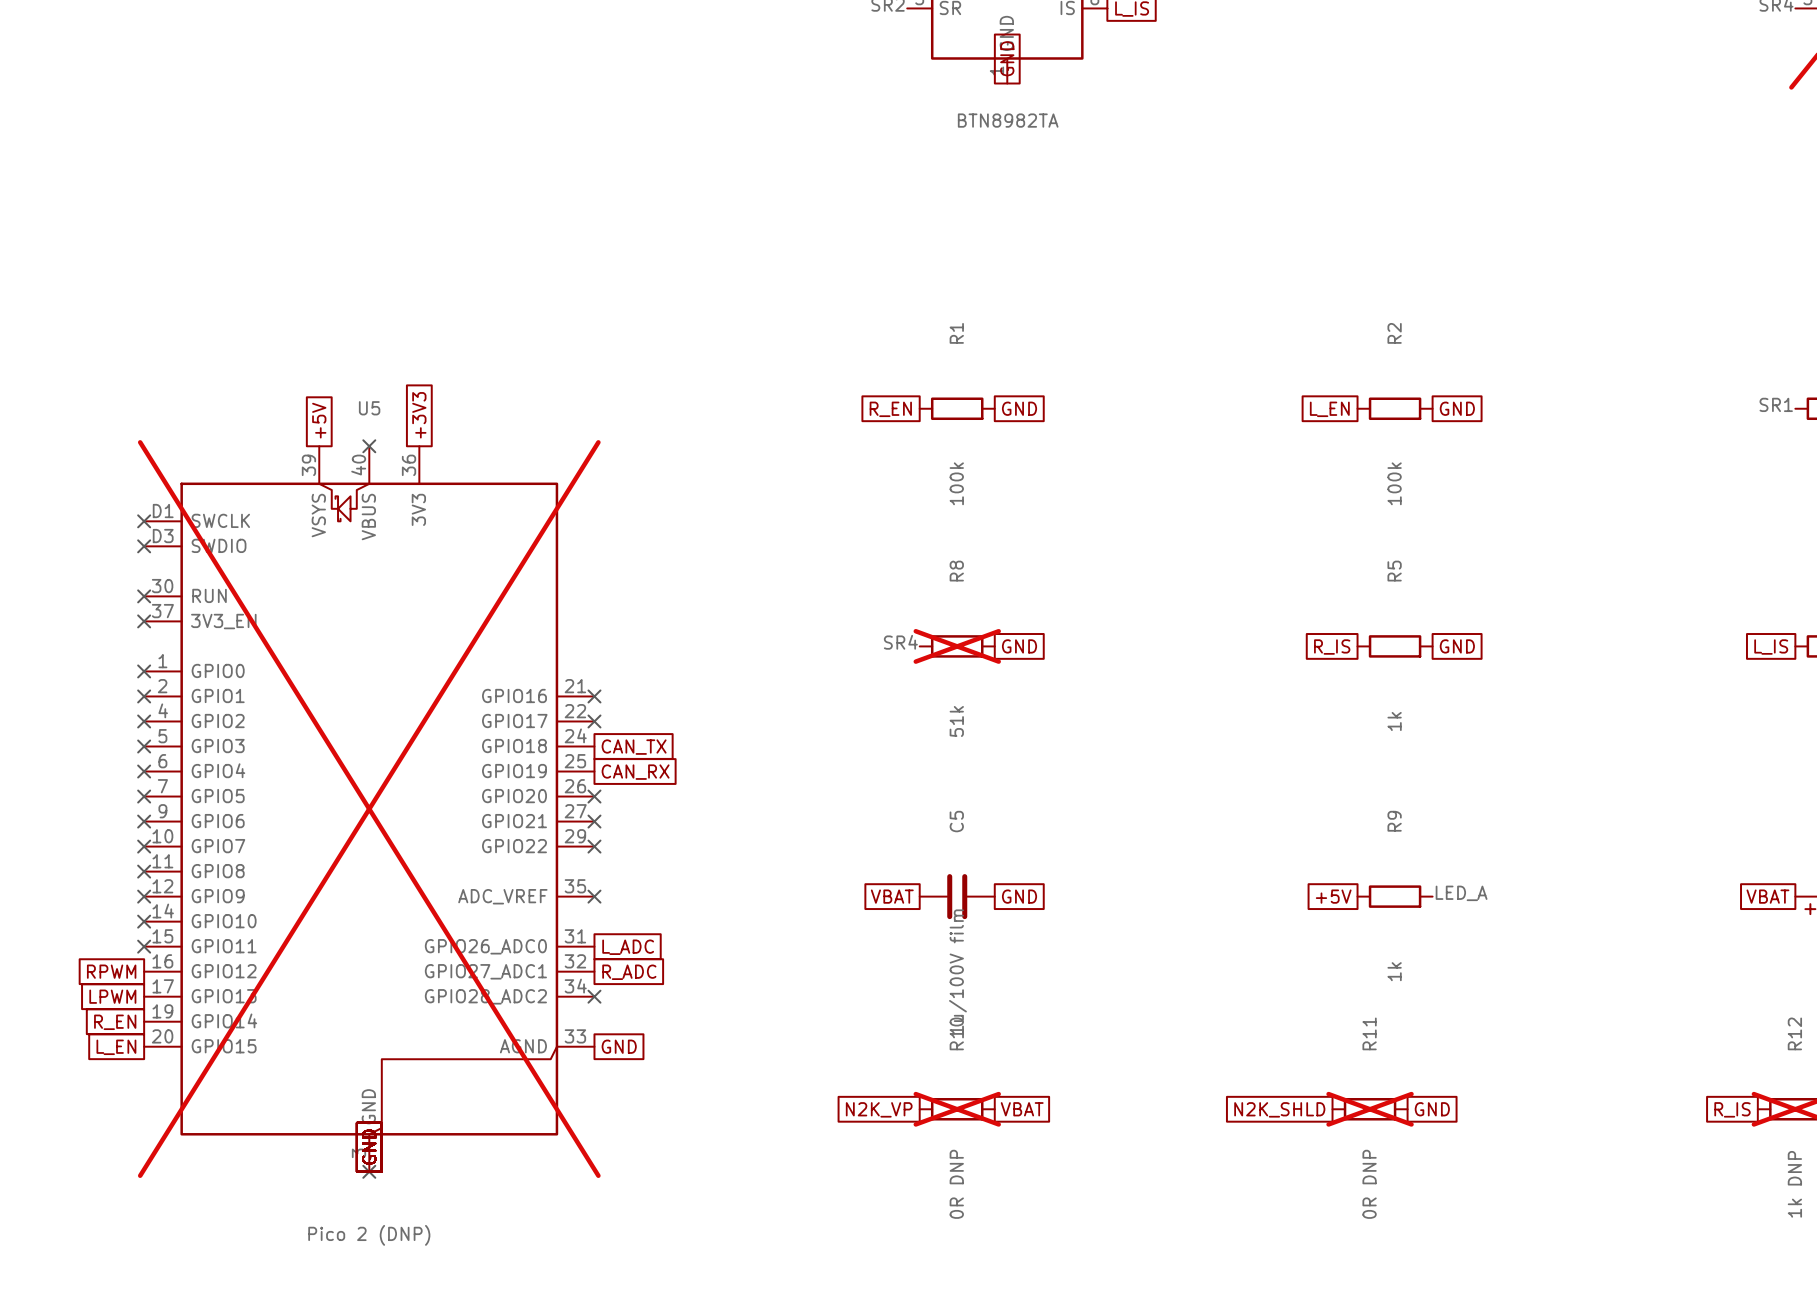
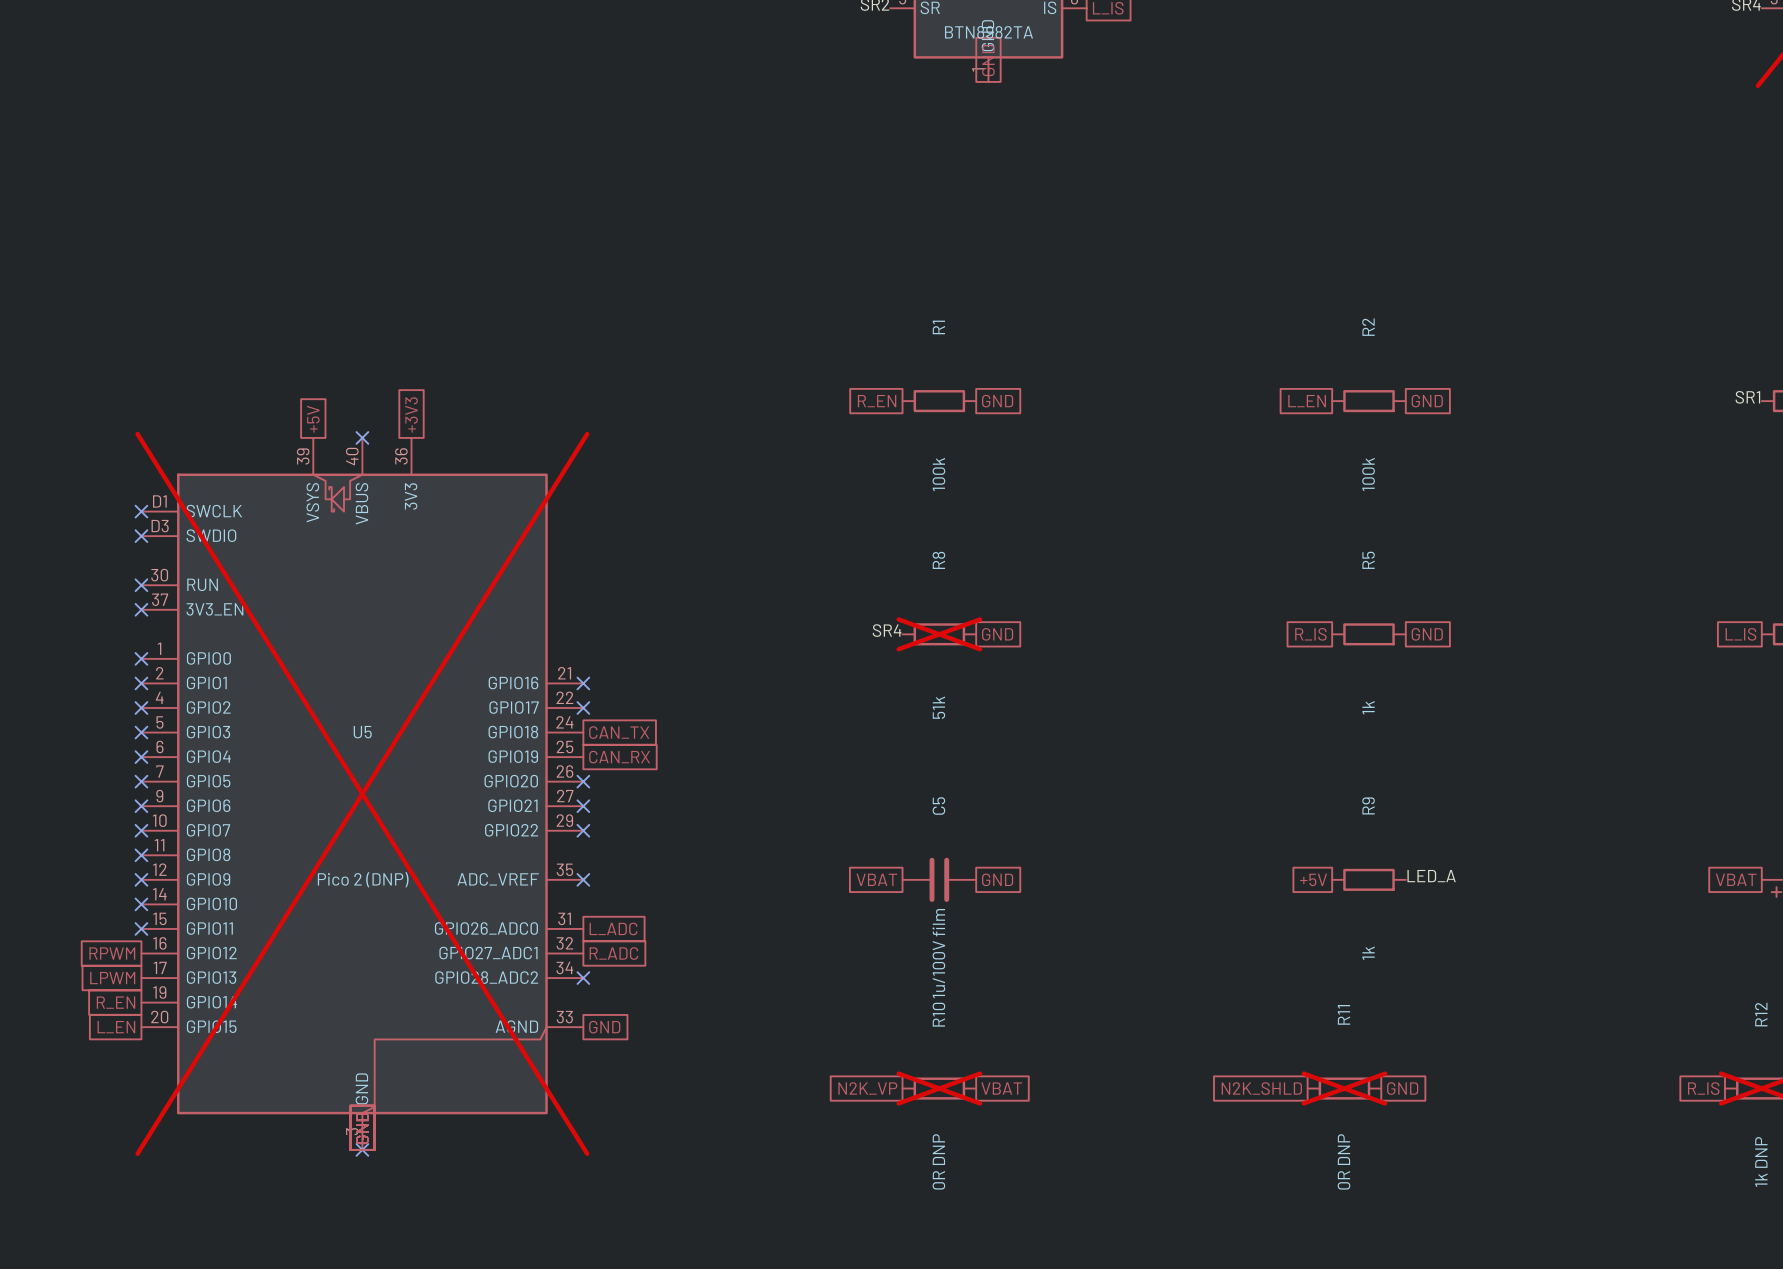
part value position: BTN8982TA (1008, 120) -> BTN8982TA (988, 32)
U5 name position: U5 (369, 408) -> U5 (362, 732)
U5 value position: Pico 2 (DNP) (369, 1235) -> Pico 2 (DNP) (363, 879)

